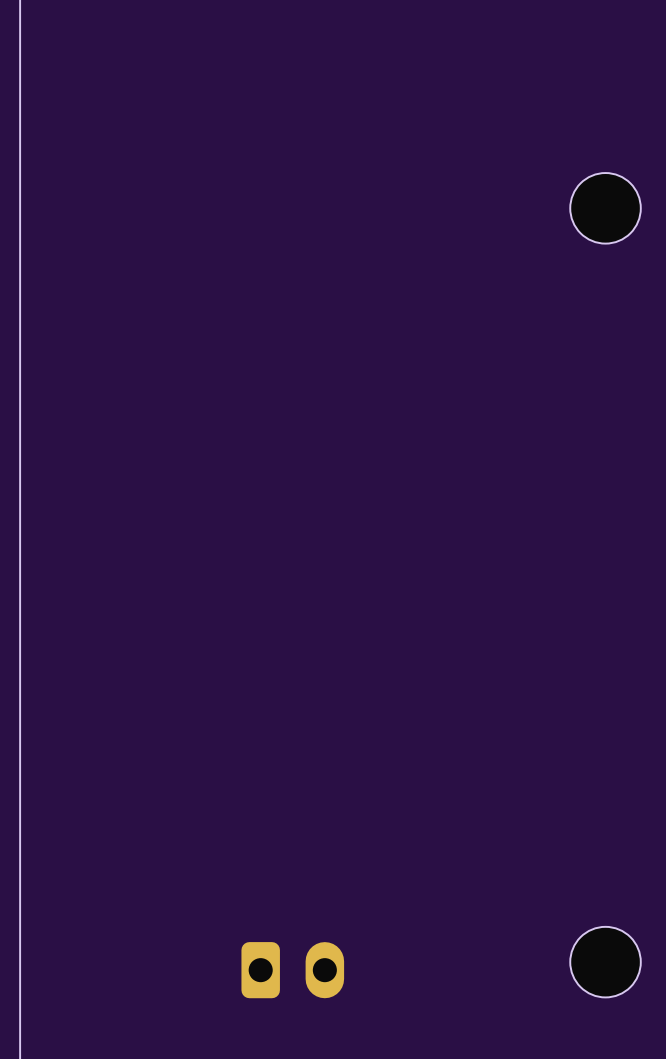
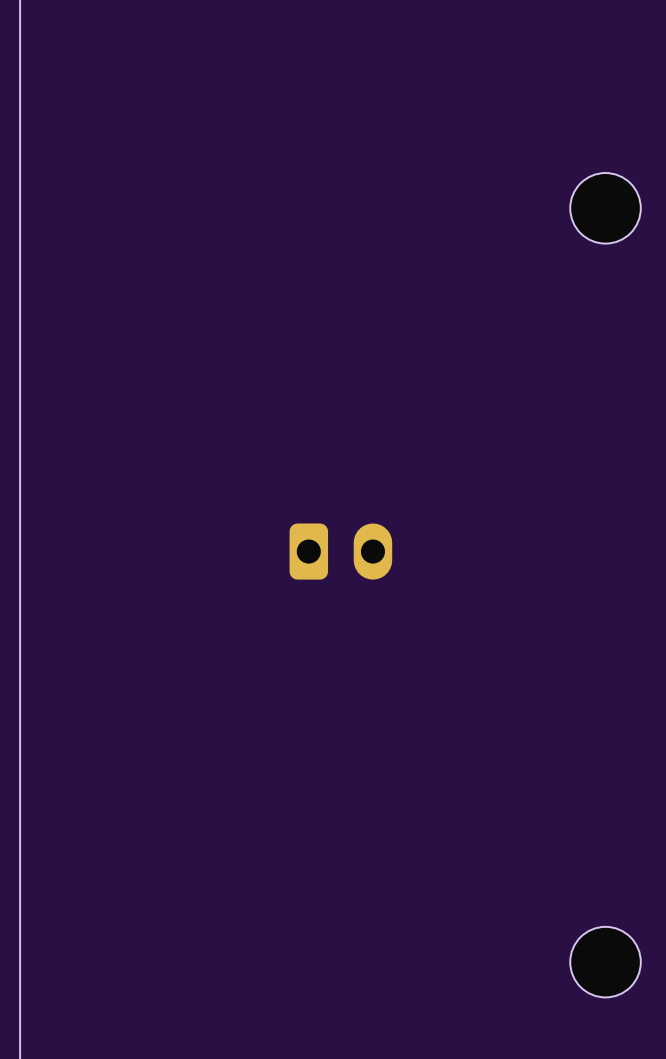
part position: (292, 970) -> (340, 551)

